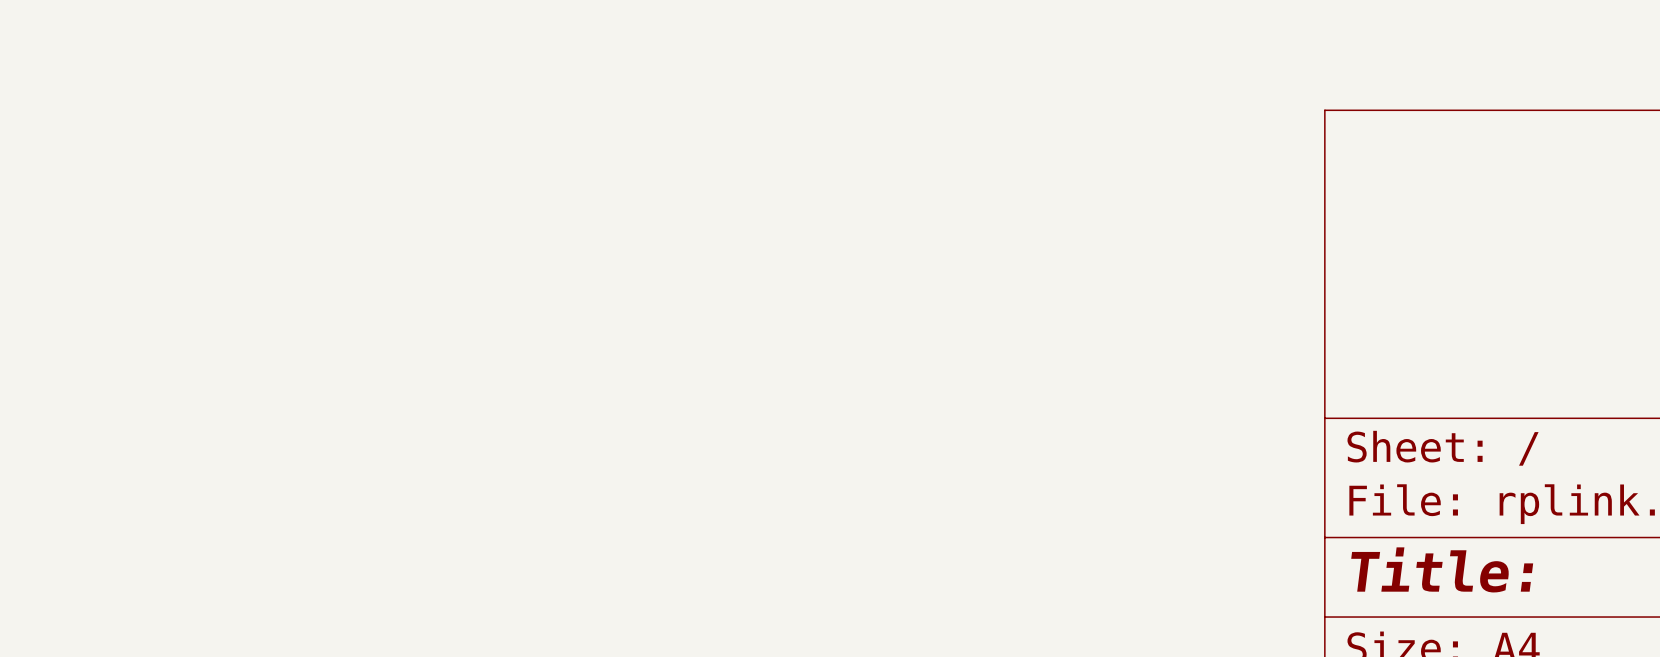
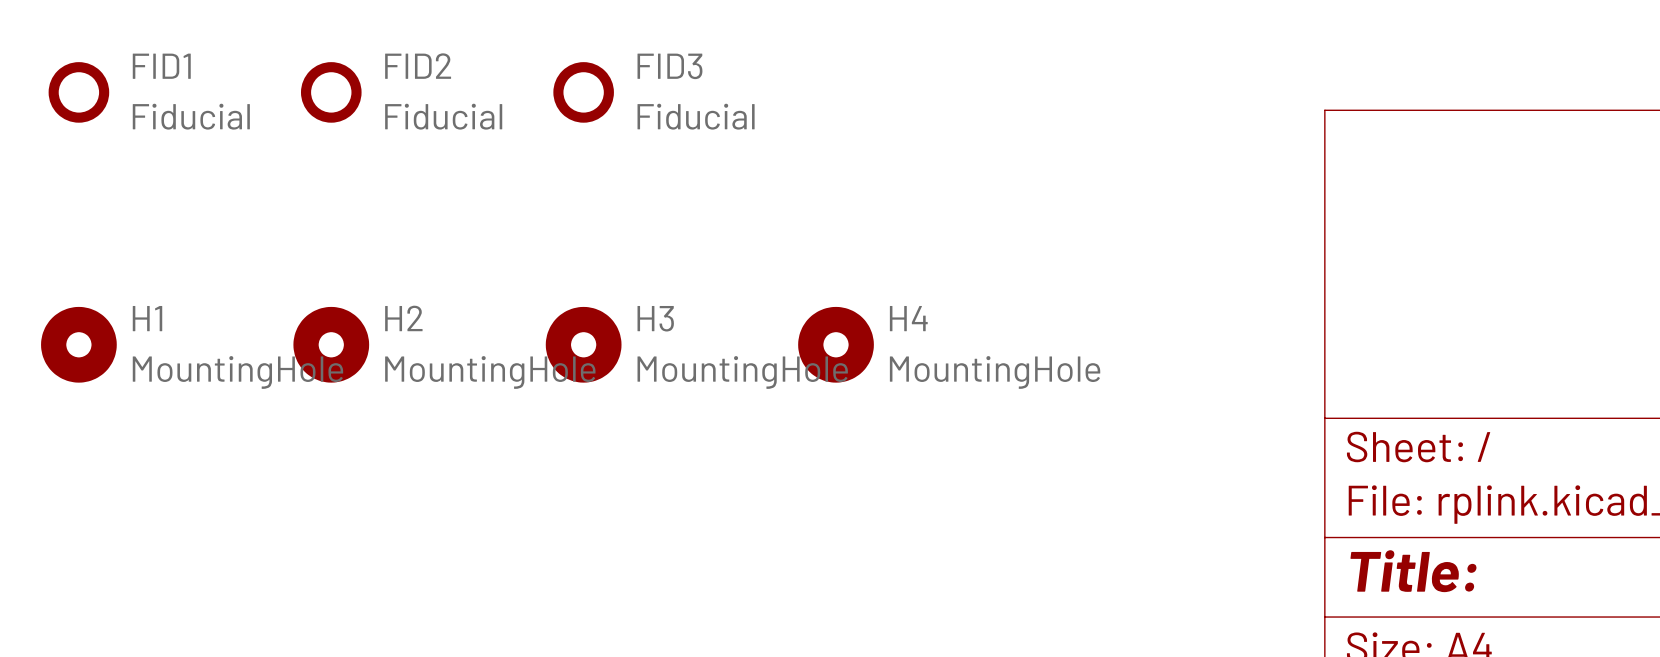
FID1: none -> Fiducial (78, 92)
FID2: none -> Fiducial (331, 92)
FID3: none -> Fiducial (583, 92)
H1: none -> MountingHole (78, 344)
H2: none -> MountingHole (331, 344)
H3: none -> MountingHole (583, 344)
H4: none -> MountingHole (836, 344)

